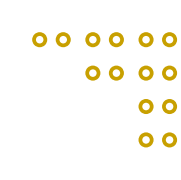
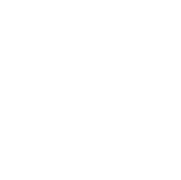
part: (51, 39) -> none
part: (104, 39) -> none
part: (157, 39) -> none
part: (104, 73) -> none
part: (157, 73) -> none
part: (157, 106) -> none
part: (157, 139) -> none

